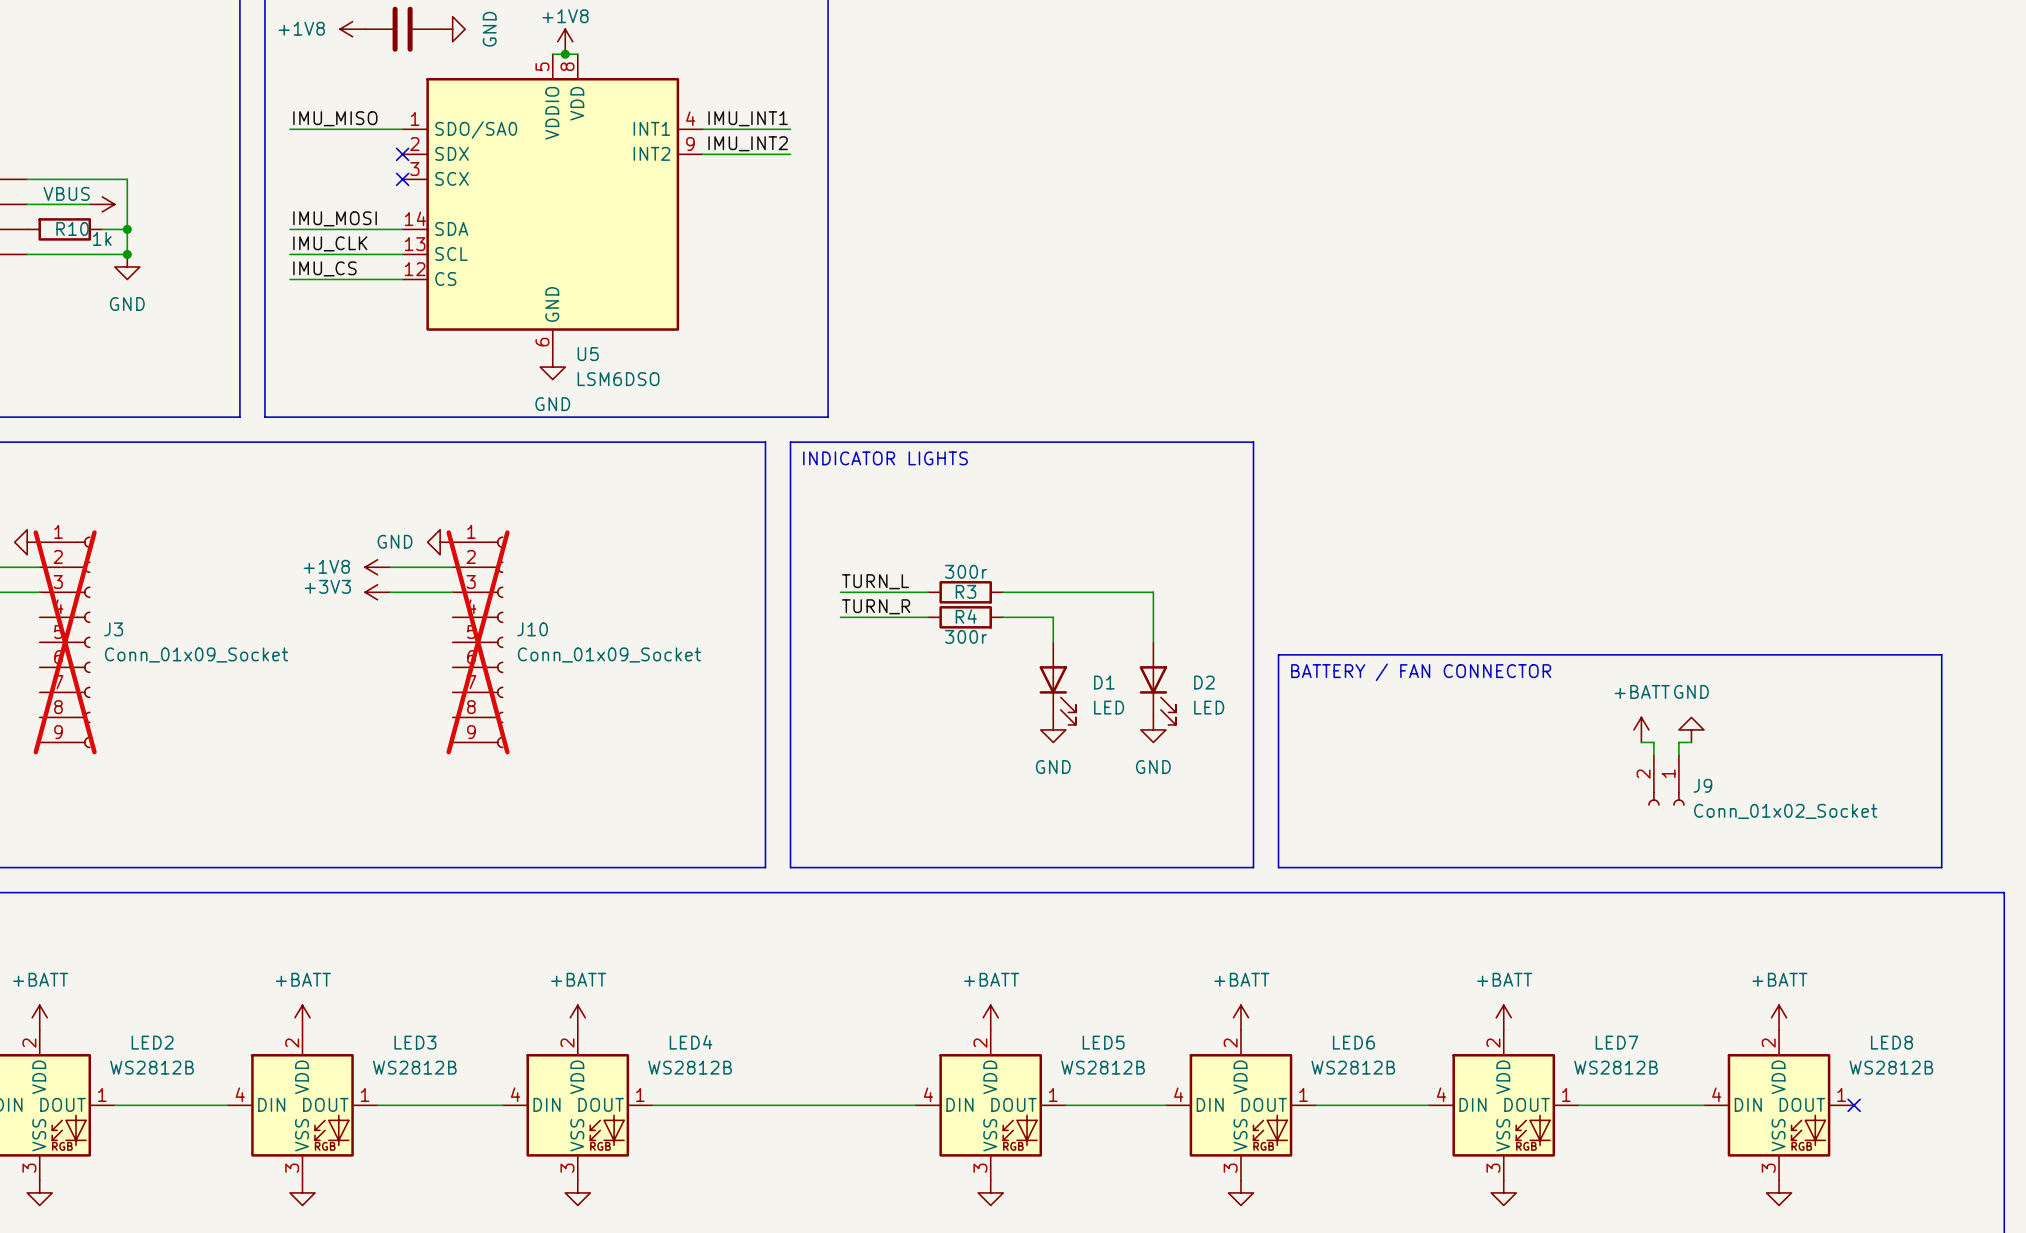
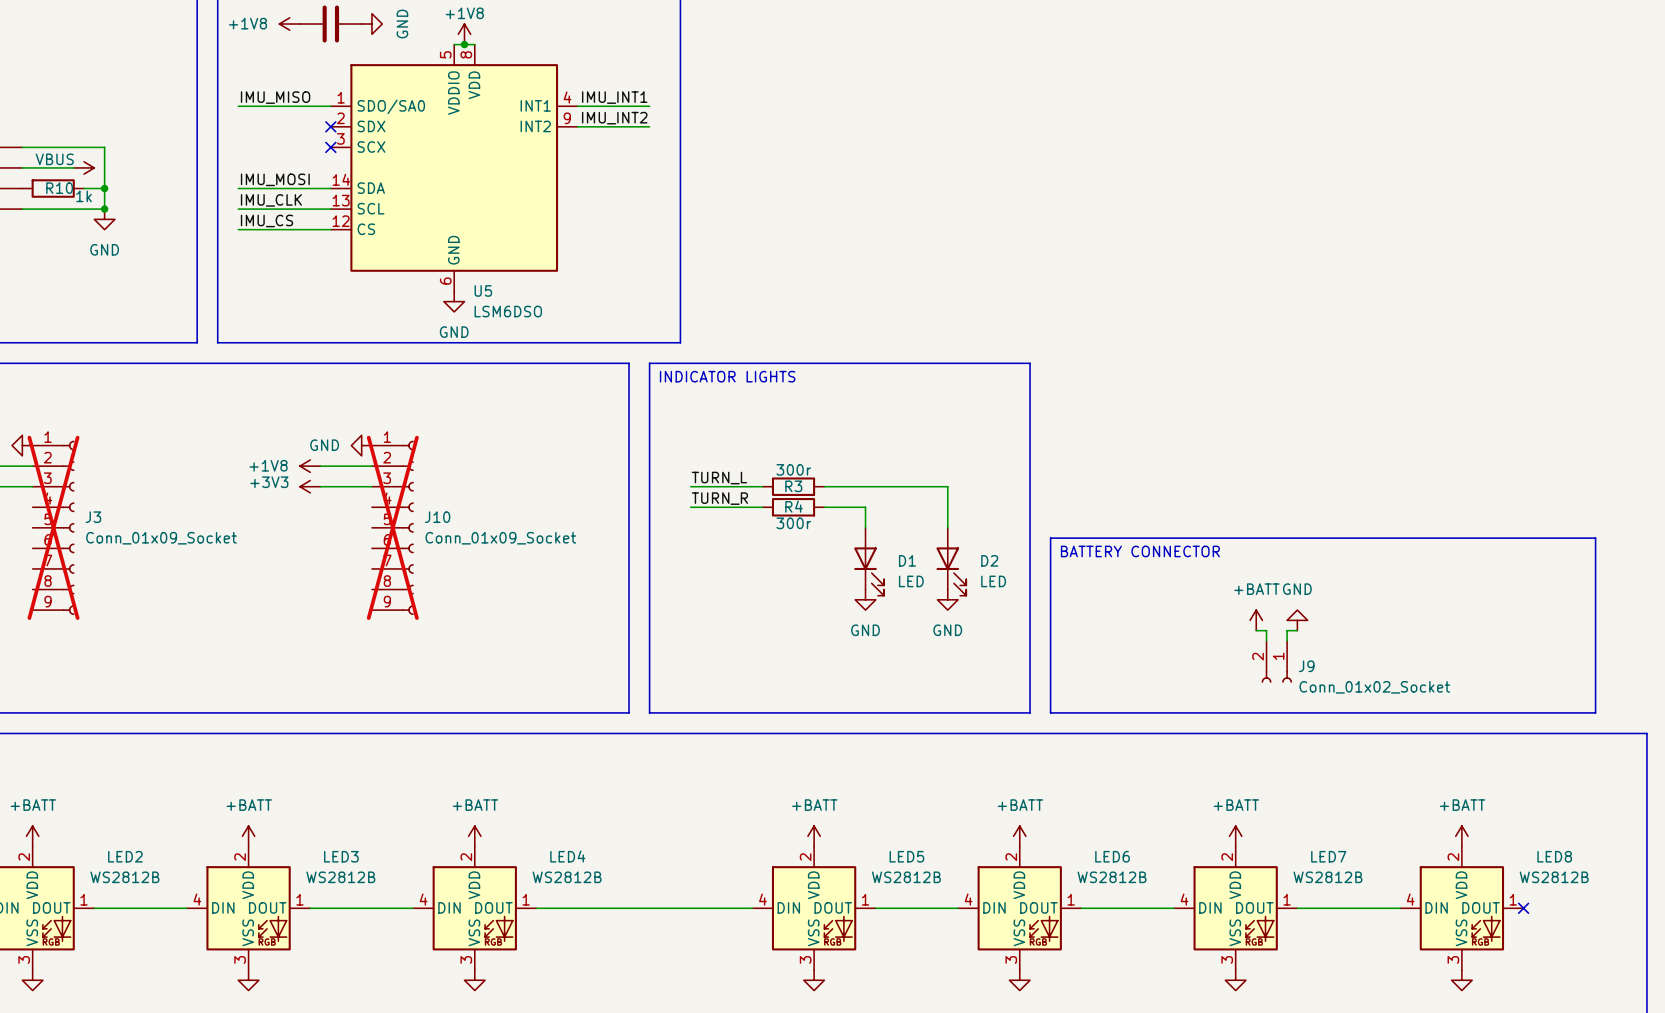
text: BATTERY / FAN CONNECTOR (1421, 672) -> BATTERY CONNECTOR (1140, 551)
power symbol position: +BATT (1641, 729) -> +BATT (1256, 620)
power symbol position: GND (1691, 729) -> GND (1297, 620)
wire: (1641, 742) (1653, 742) (1653, 754) -> (1256, 630) (1266, 630) (1266, 640)
wire: (1691, 742) (1678, 742) (1678, 754) -> (1297, 630) (1287, 630) (1287, 640)
J9 position: (1666, 780) -> (1276, 661)

